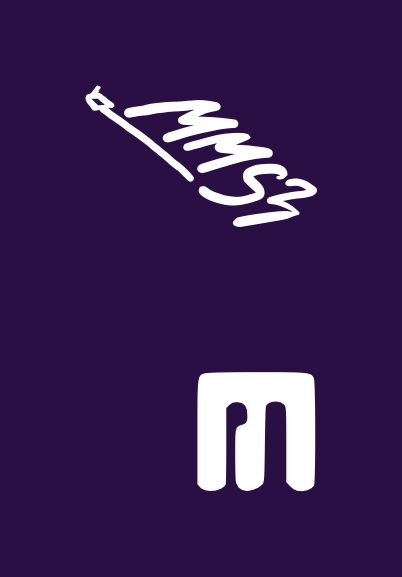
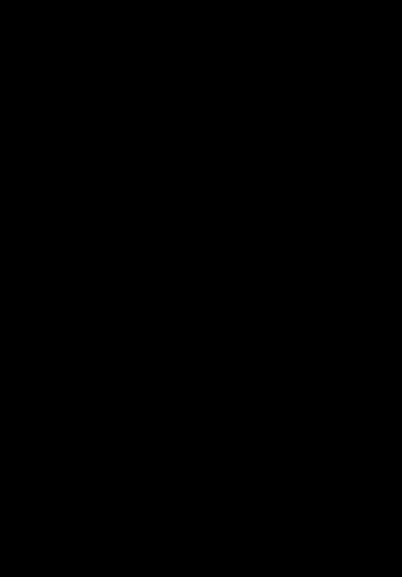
drawing: [85, 85, 317, 227] -> none
drawing: [197, 372, 316, 492] -> none

